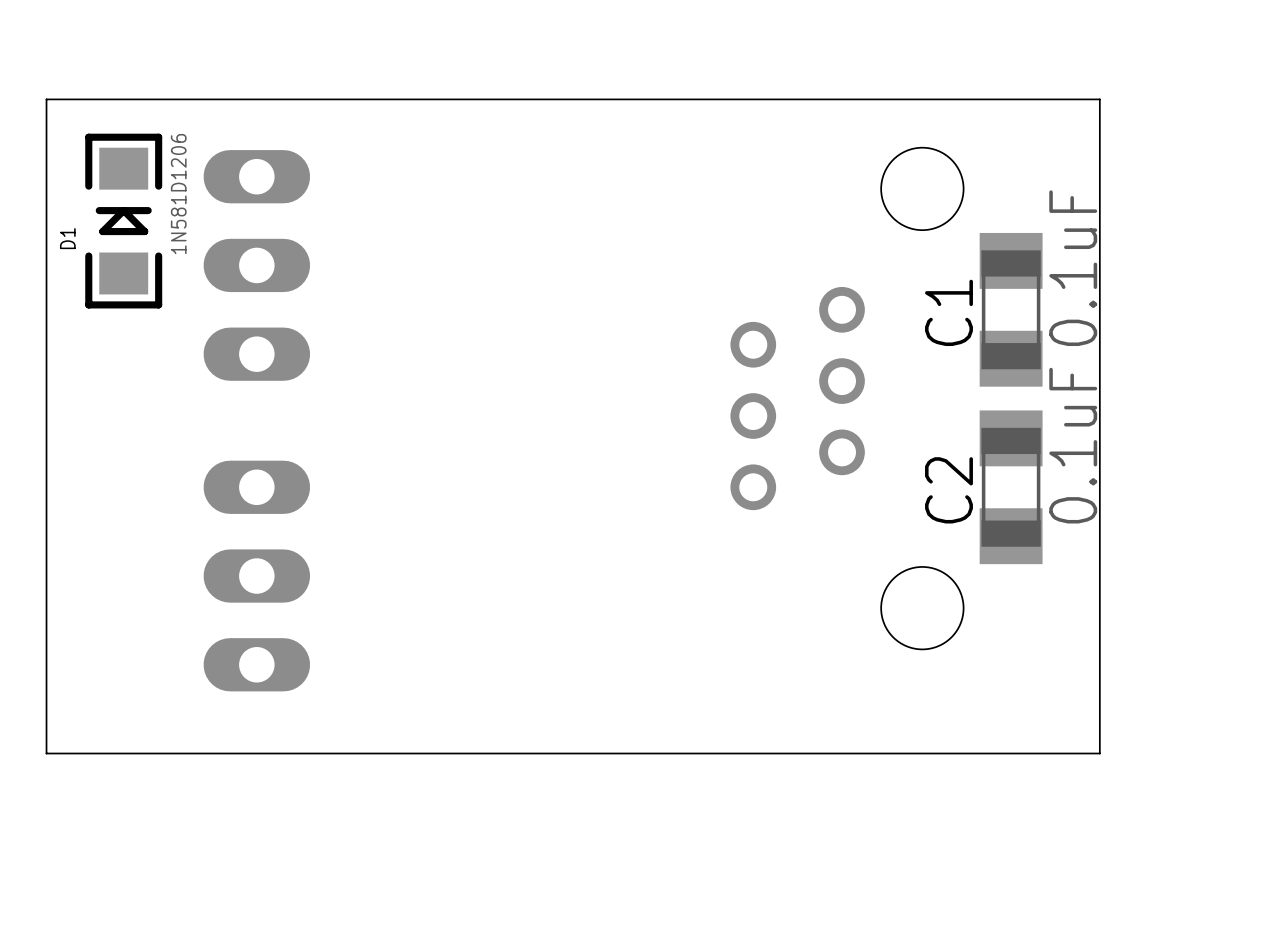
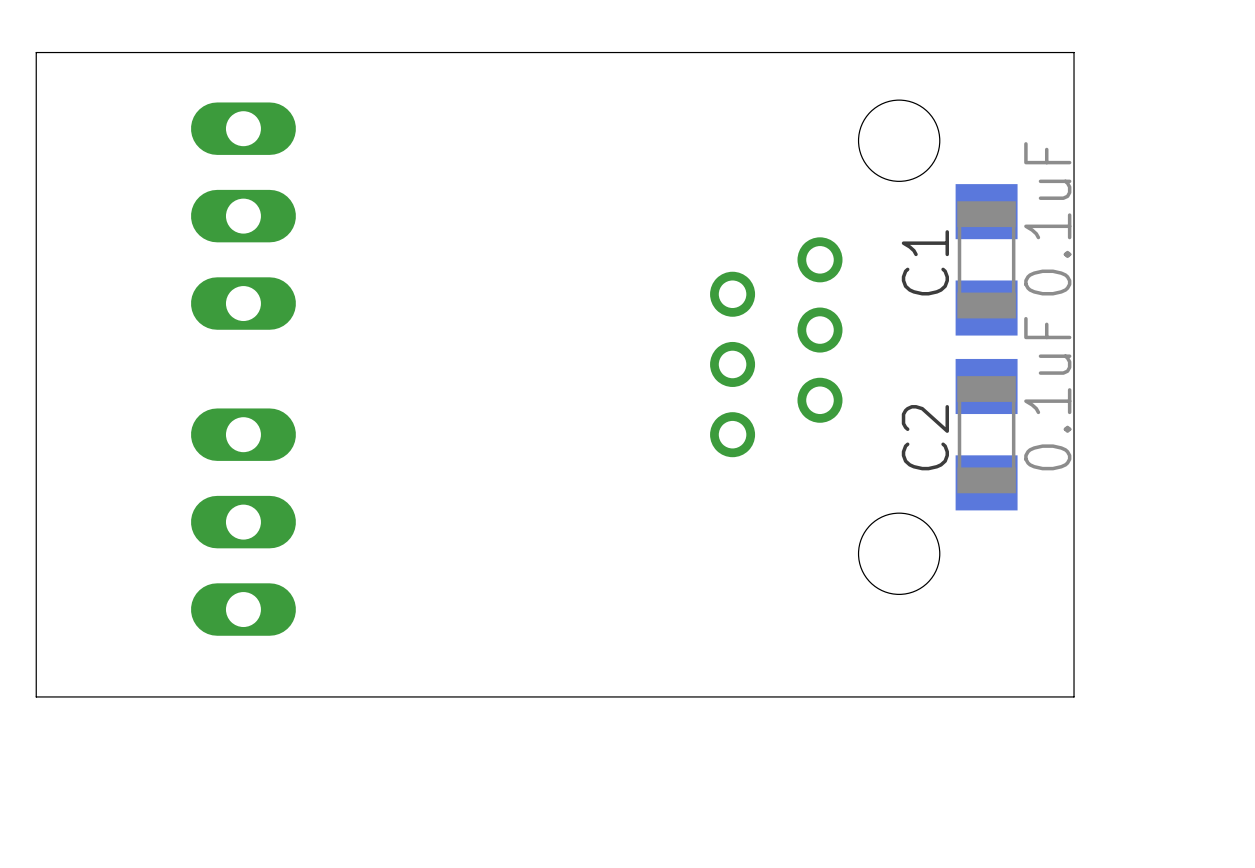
D1: 1N581D1206 (123, 221) -> none

